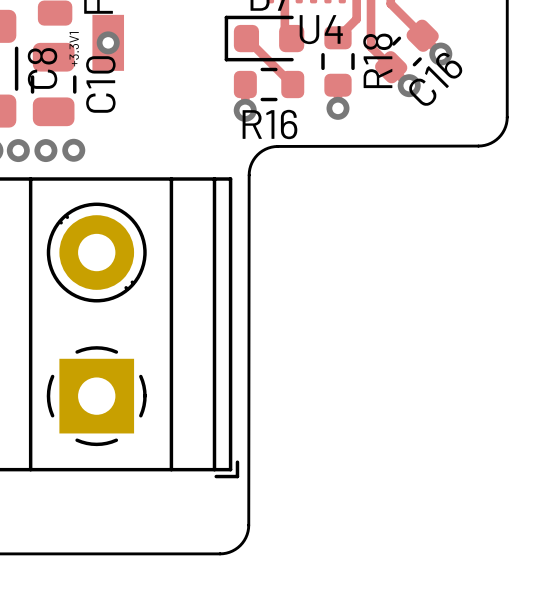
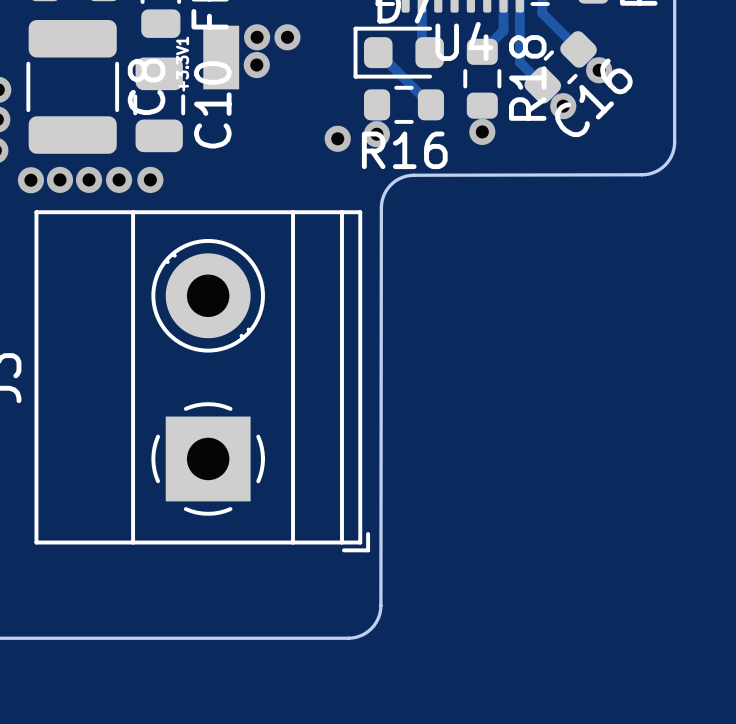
via: none -> (257, 37)
via: none -> (287, 37)
via: (108, 42) -> none
via: none -> (256, 65)
via: none -> (337, 138)
via: (73, 150) -> none

